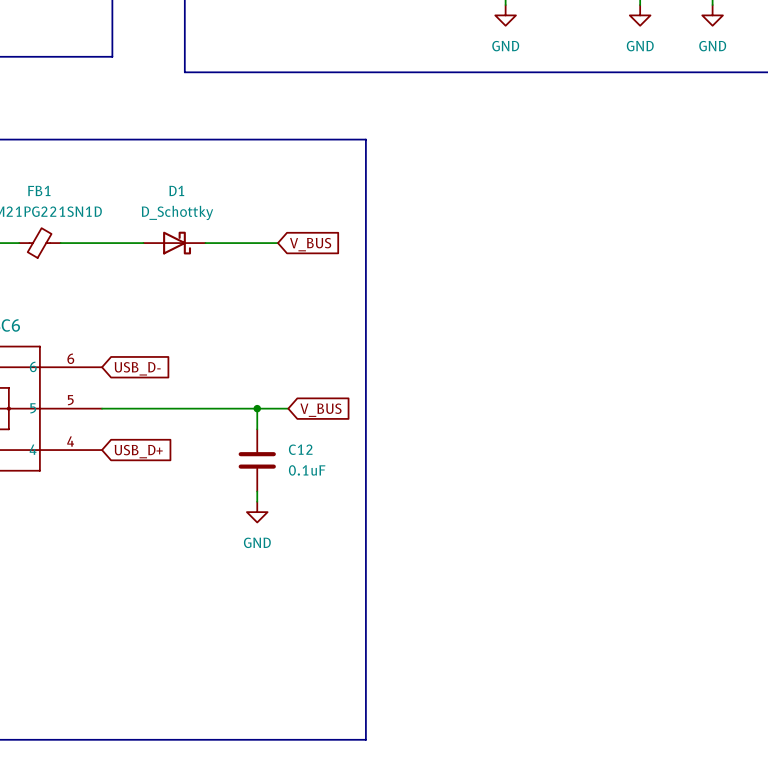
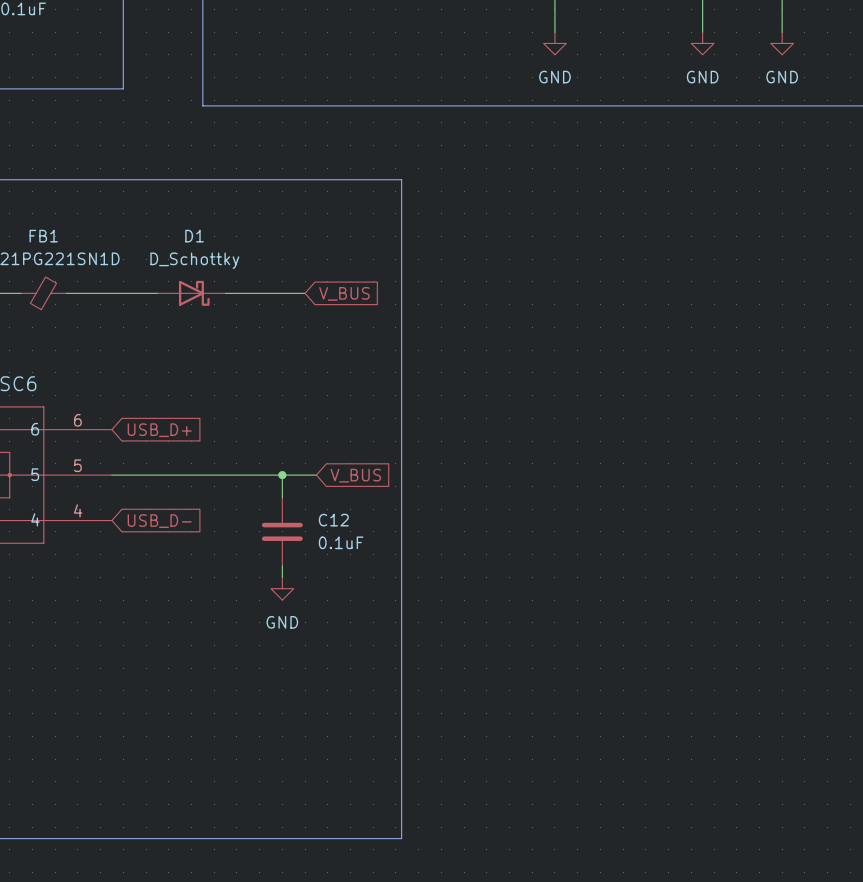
global label: USB_D- (137, 368) -> USB_D+ (159, 430)
global label: USB_D+ (138, 451) -> USB_D- (159, 521)

